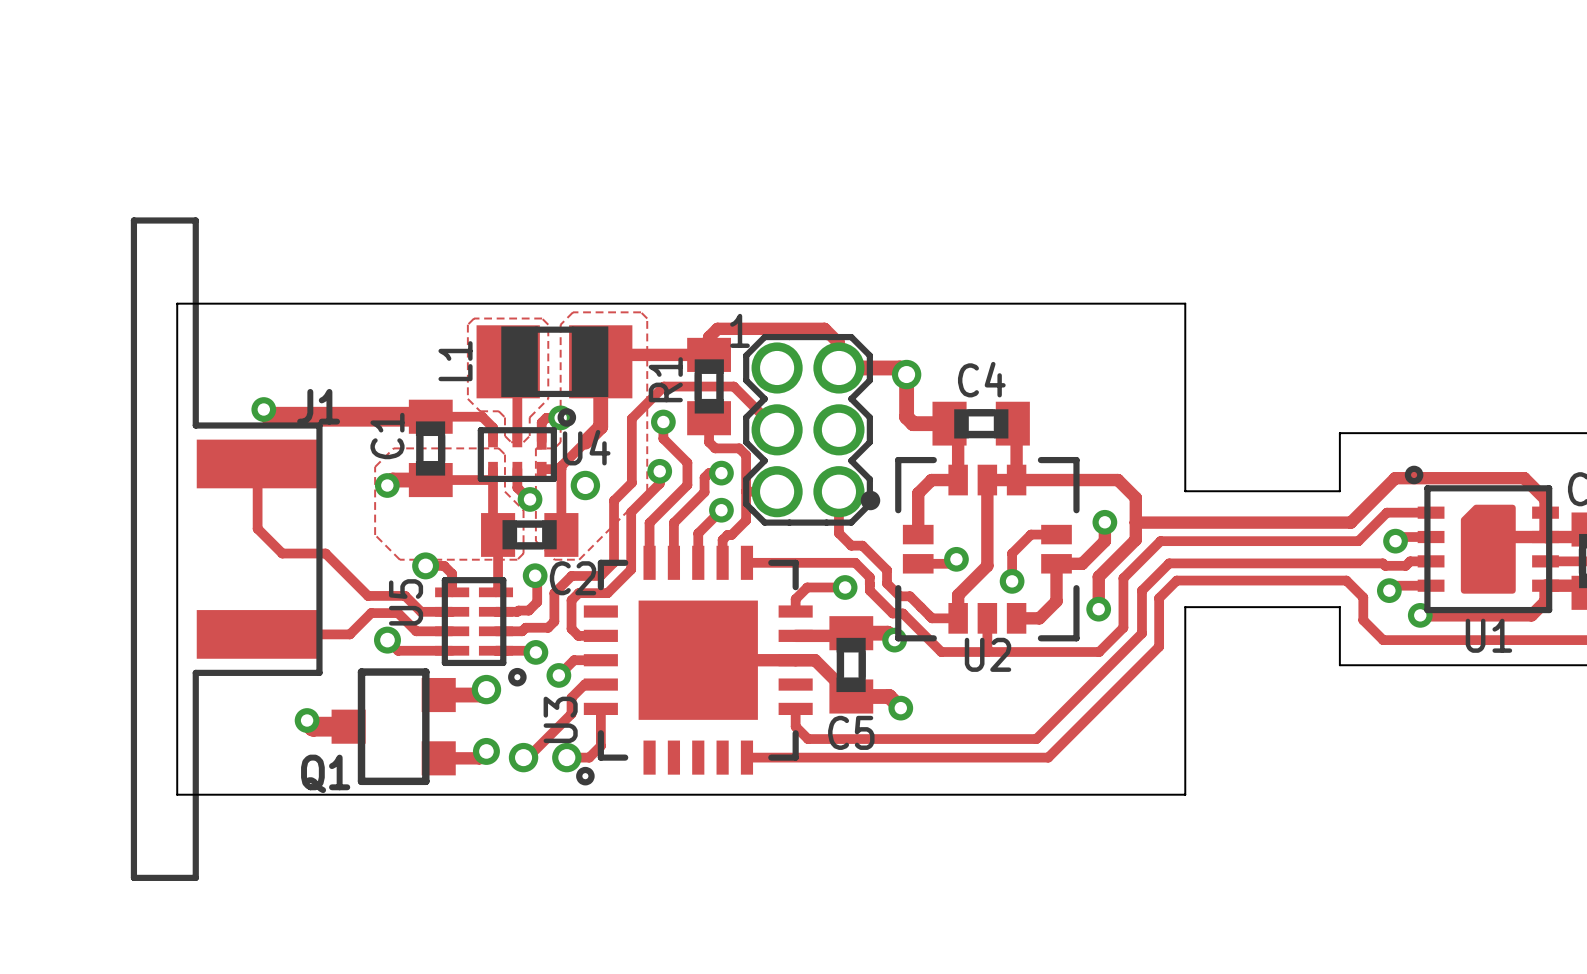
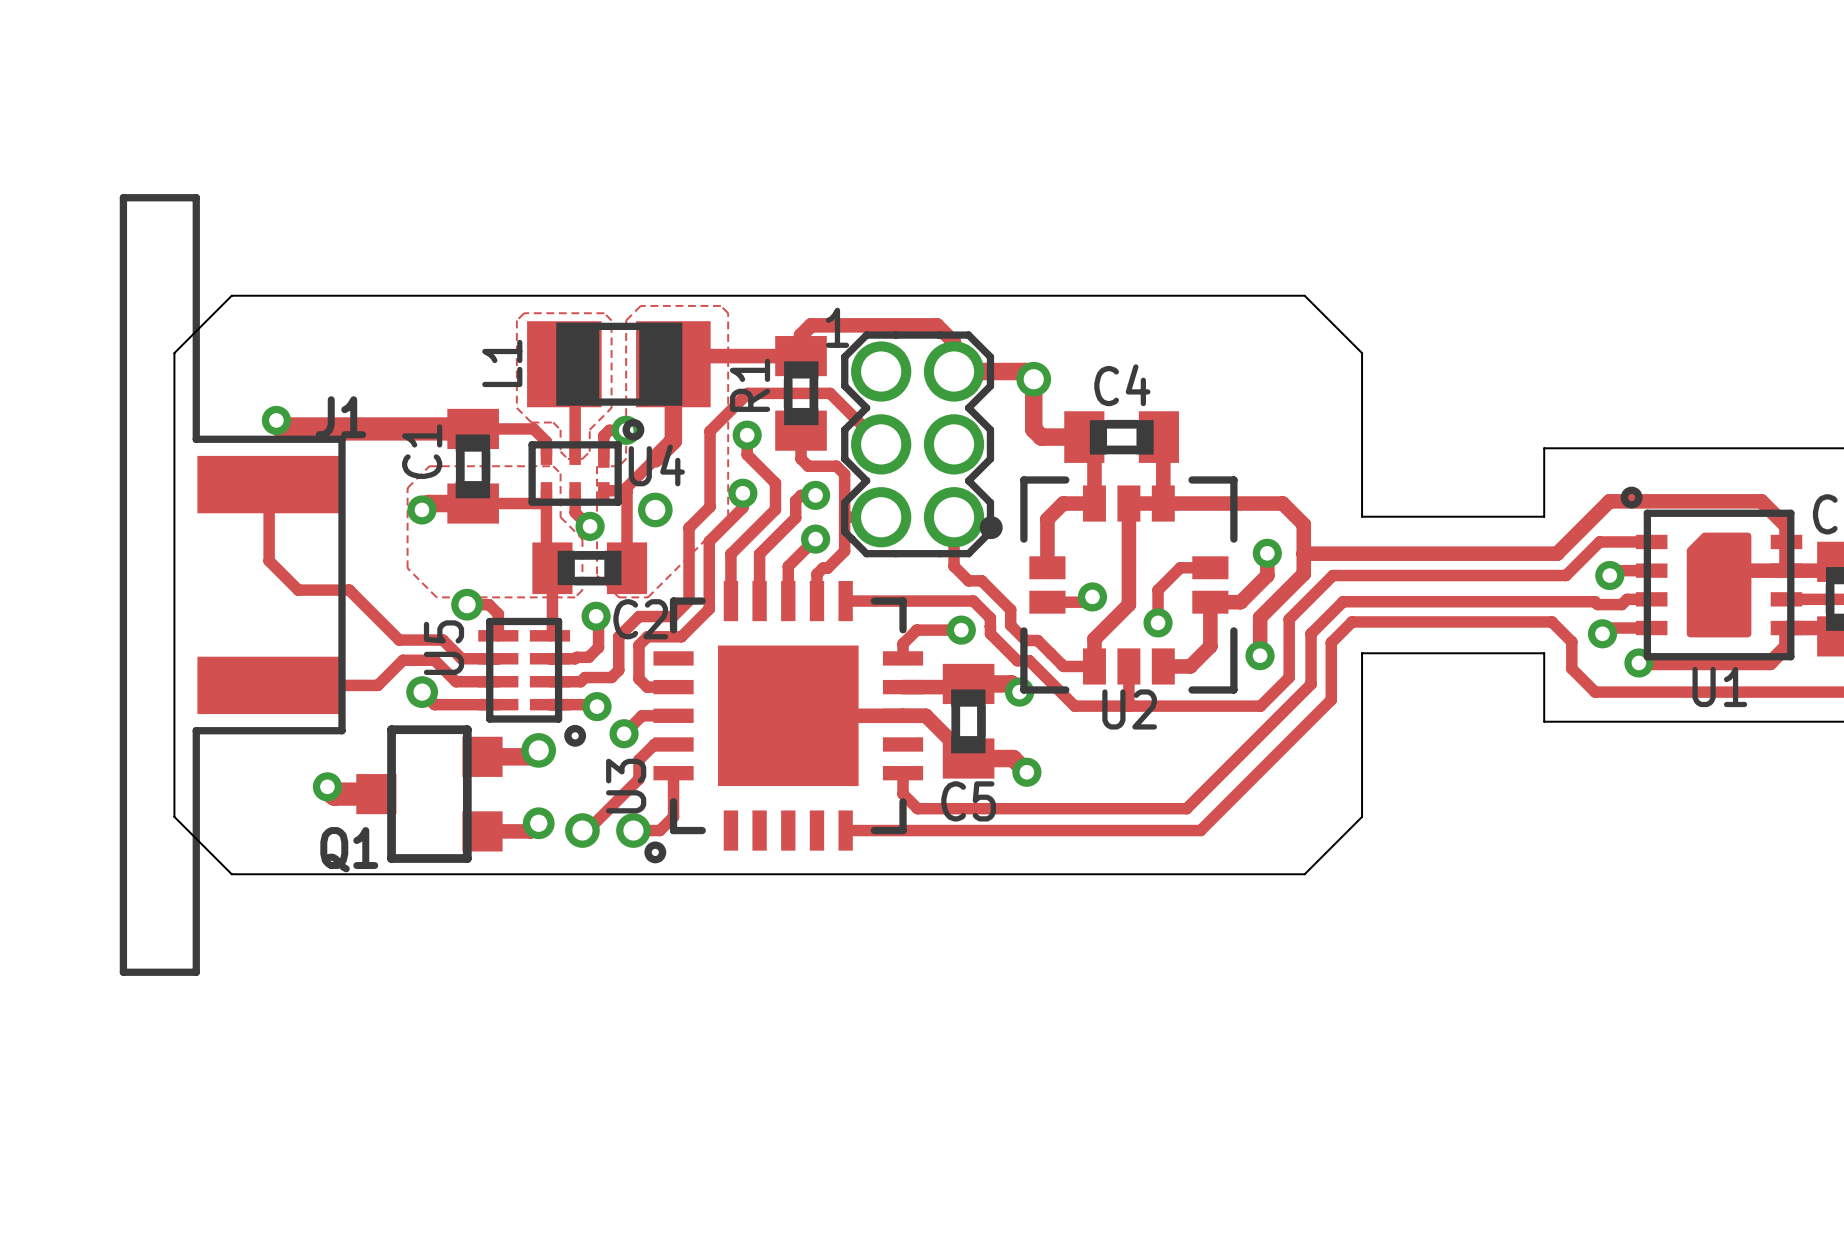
board edge: (225, 303) (177, 303) (177, 352) -> (231, 295) (174, 353)
board edge: (1136, 303) (1185, 303) (1185, 352) -> (1304, 295) (1362, 353)
board edge: (177, 746) (177, 794) (225, 794) -> (174, 816) (231, 874)
board edge: (1185, 746) (1185, 794) (1136, 794) -> (1362, 816) (1304, 874)

